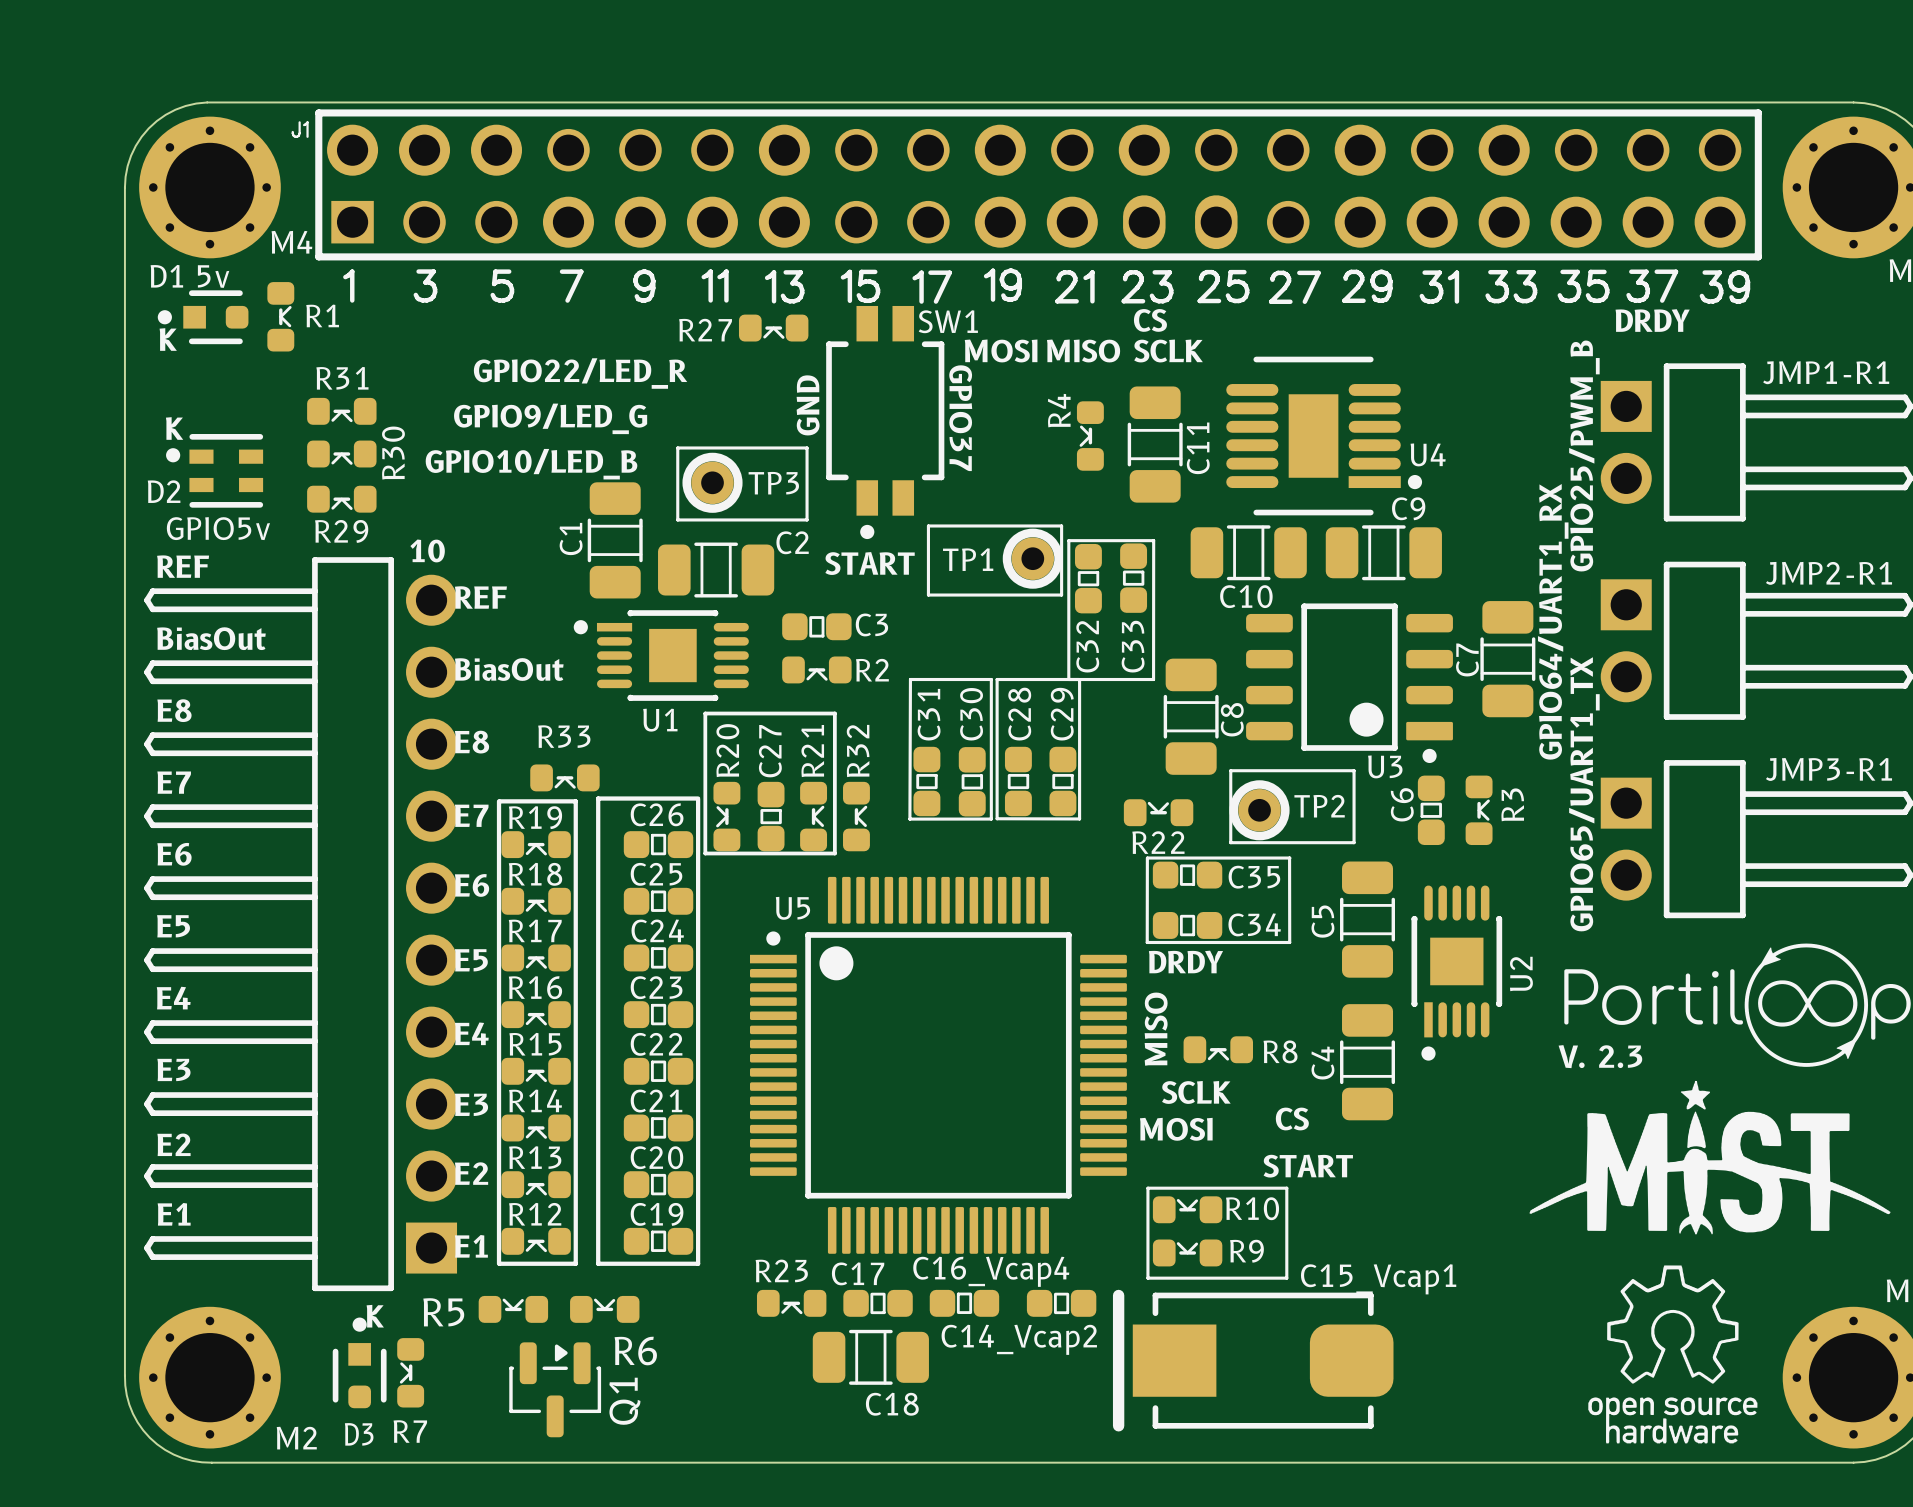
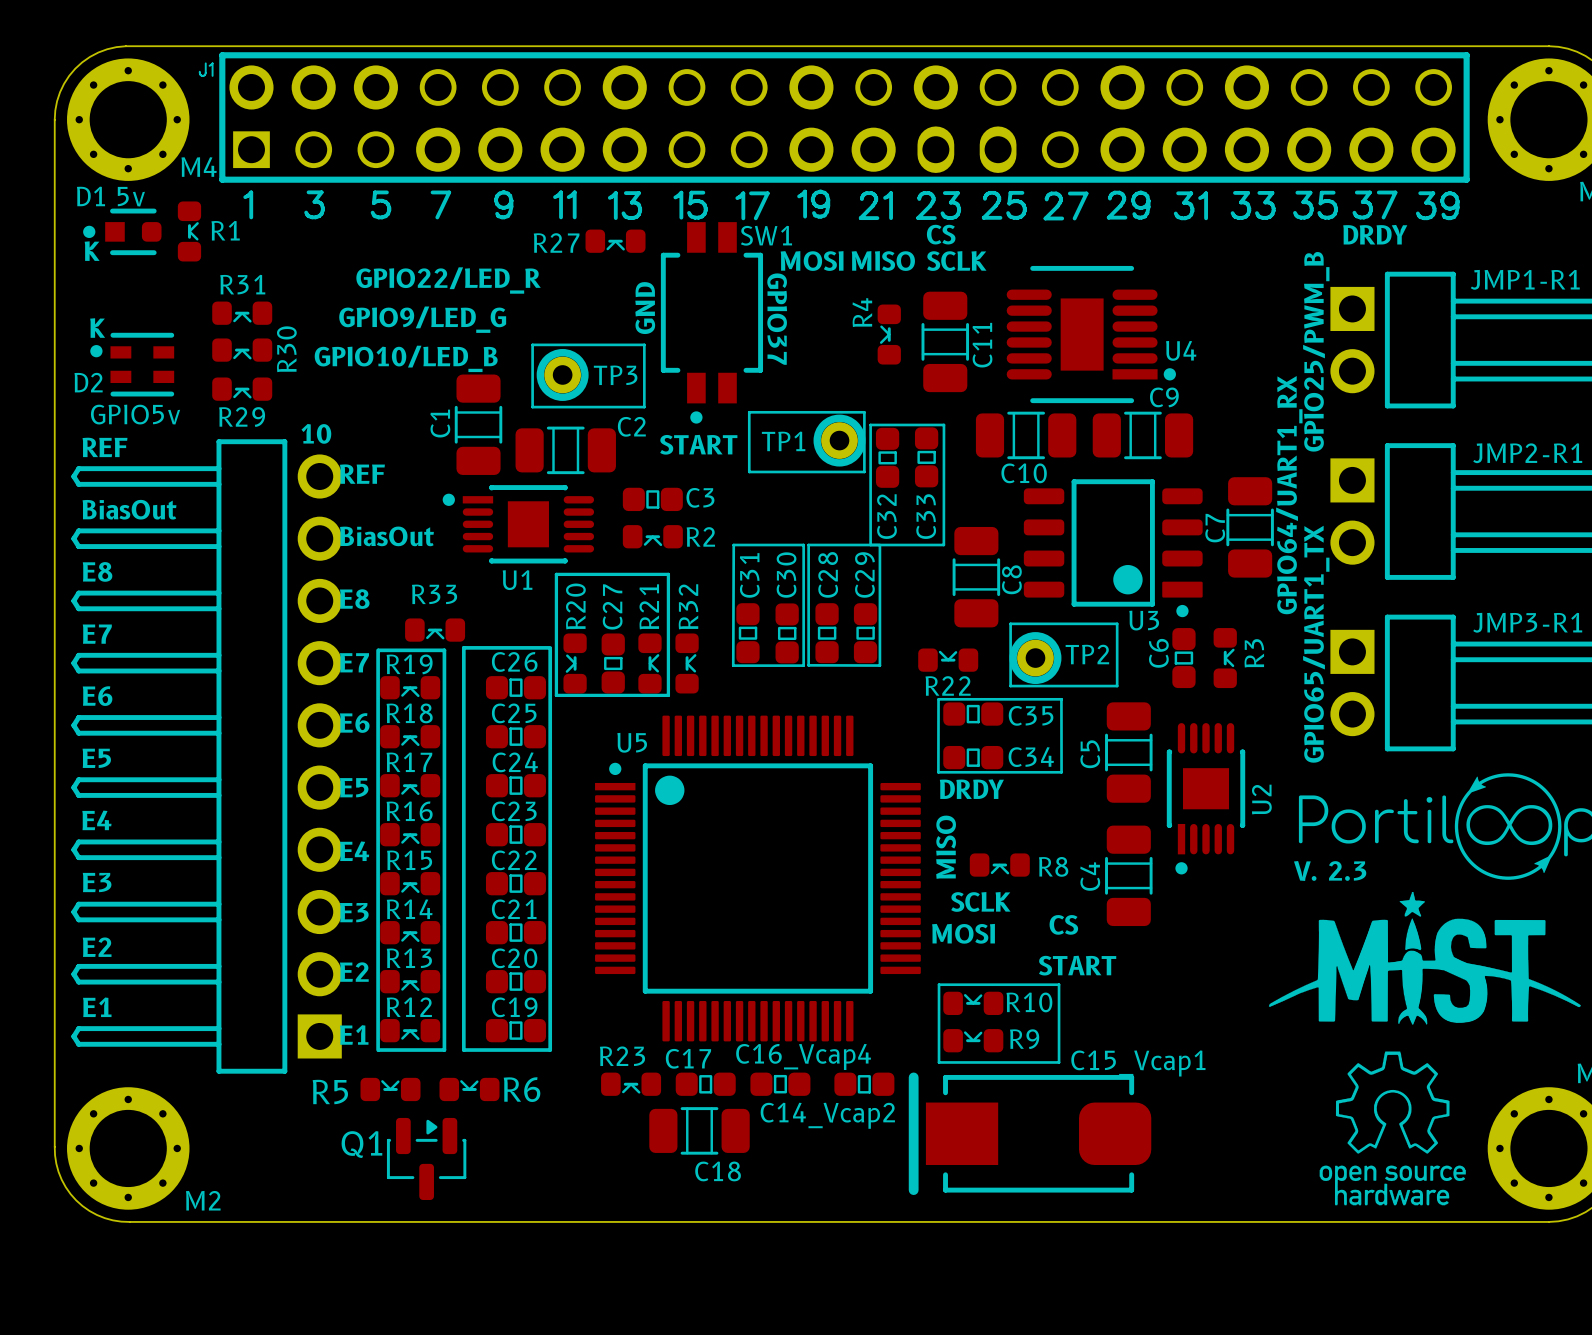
text: K (375, 1316) -> none
R6 name position: R6 (635, 1351) -> R6 (522, 1089)
D3: (359, 1362) -> none
R7: (410, 1372) -> none
Q1 name rotation: 0° (624, 1401) -> 90° clockwise (361, 1144)
Q1 name position: Q1 (624, 1401) -> Q1 (361, 1144)

